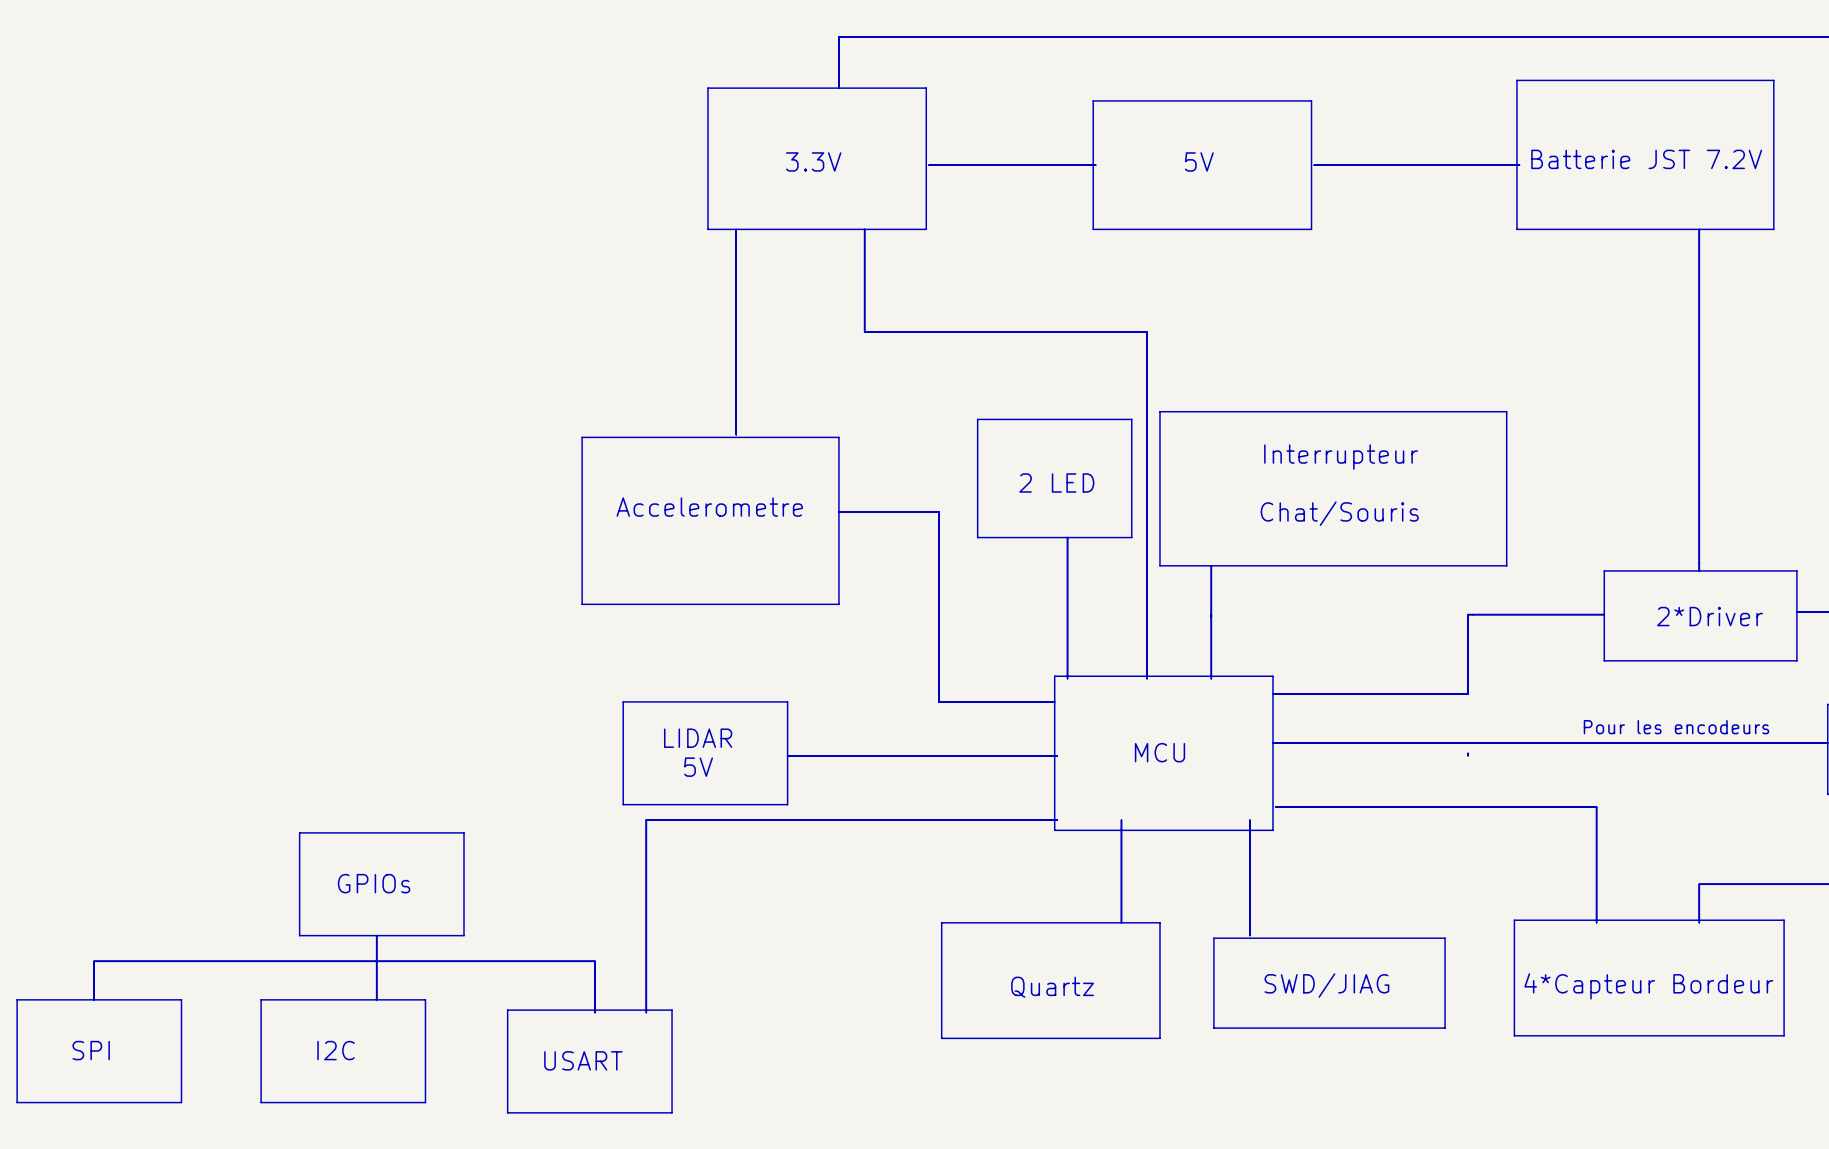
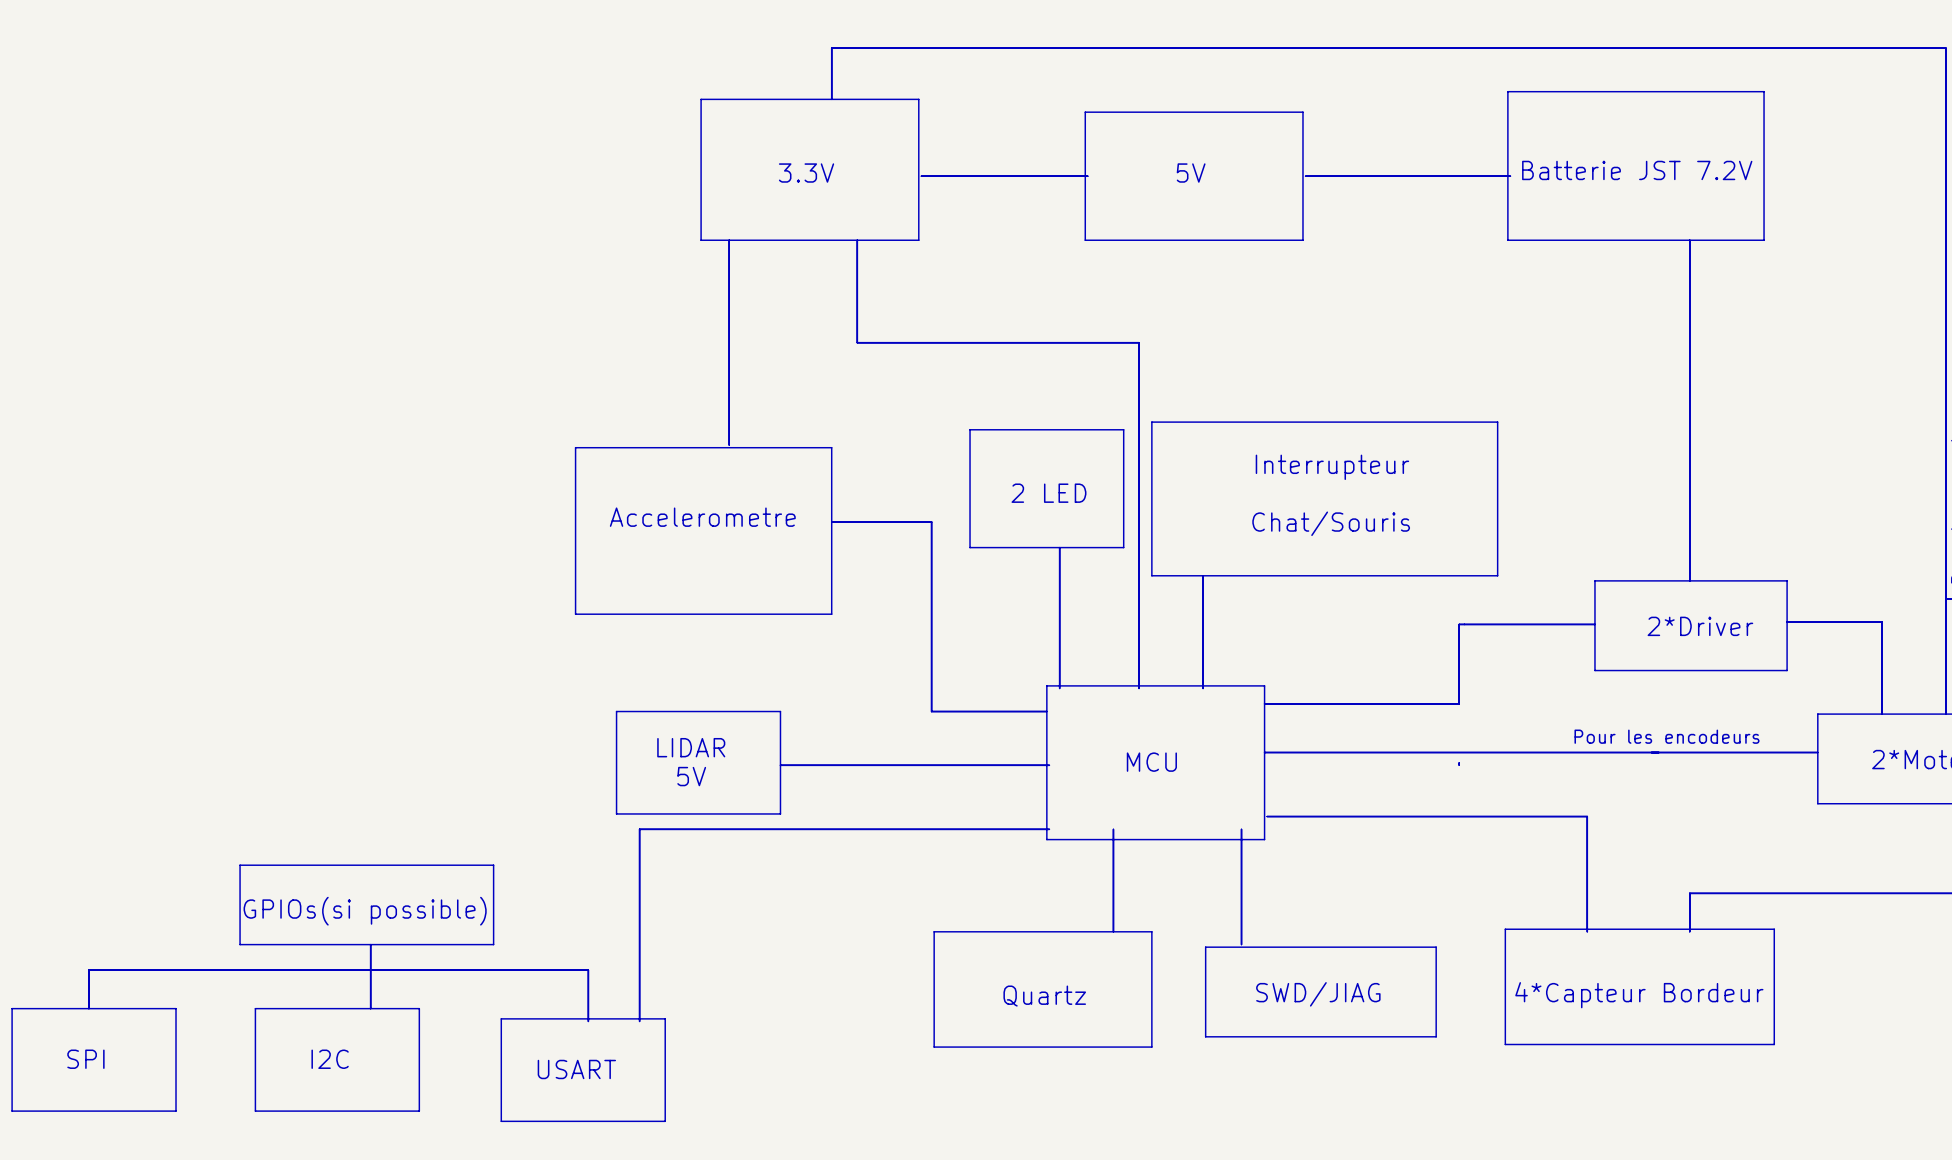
text: GPIOs (374, 883) -> none
text: none -> GPIOs(si possible) (365, 911)
line: (299, 935) (299, 832) (463, 832) (463, 935) -> (293, 944) (240, 944) (240, 865) (493, 865) (493, 944) (457, 944)

